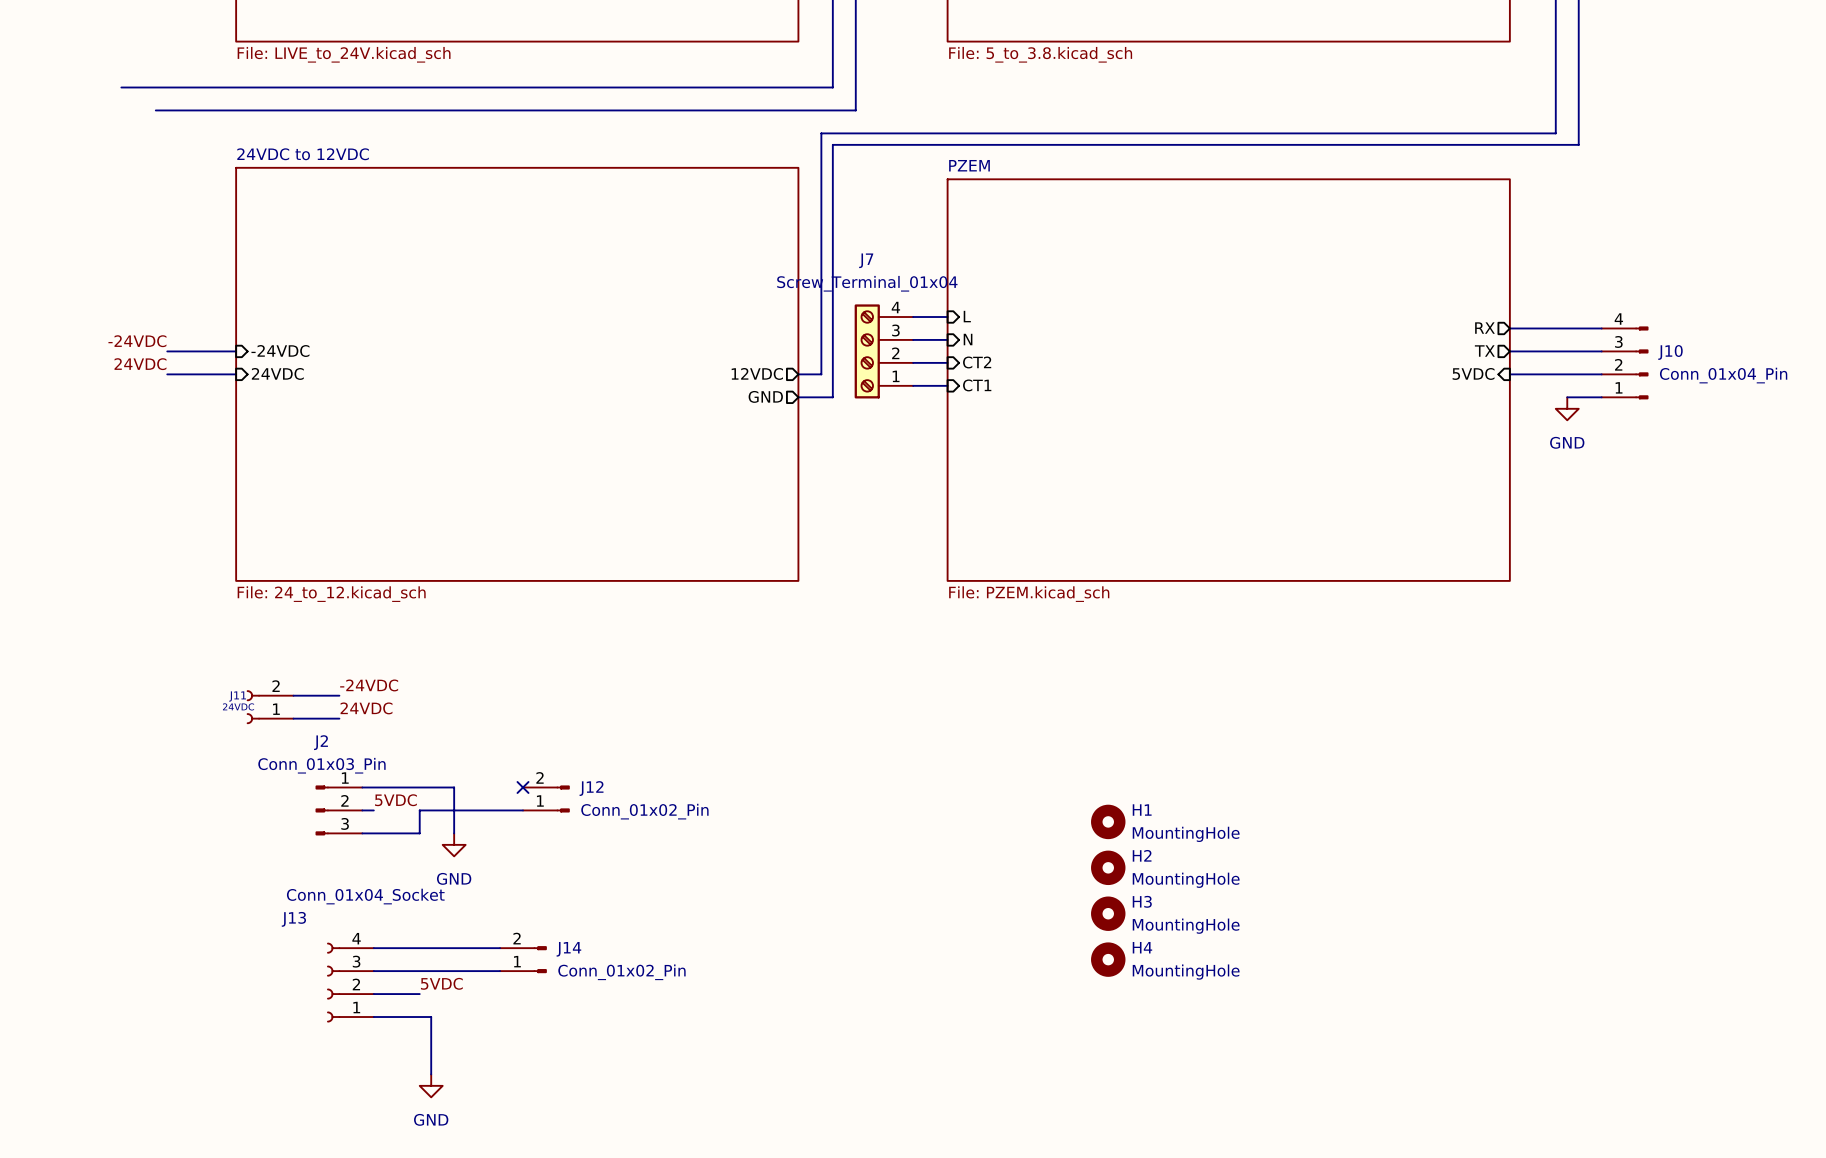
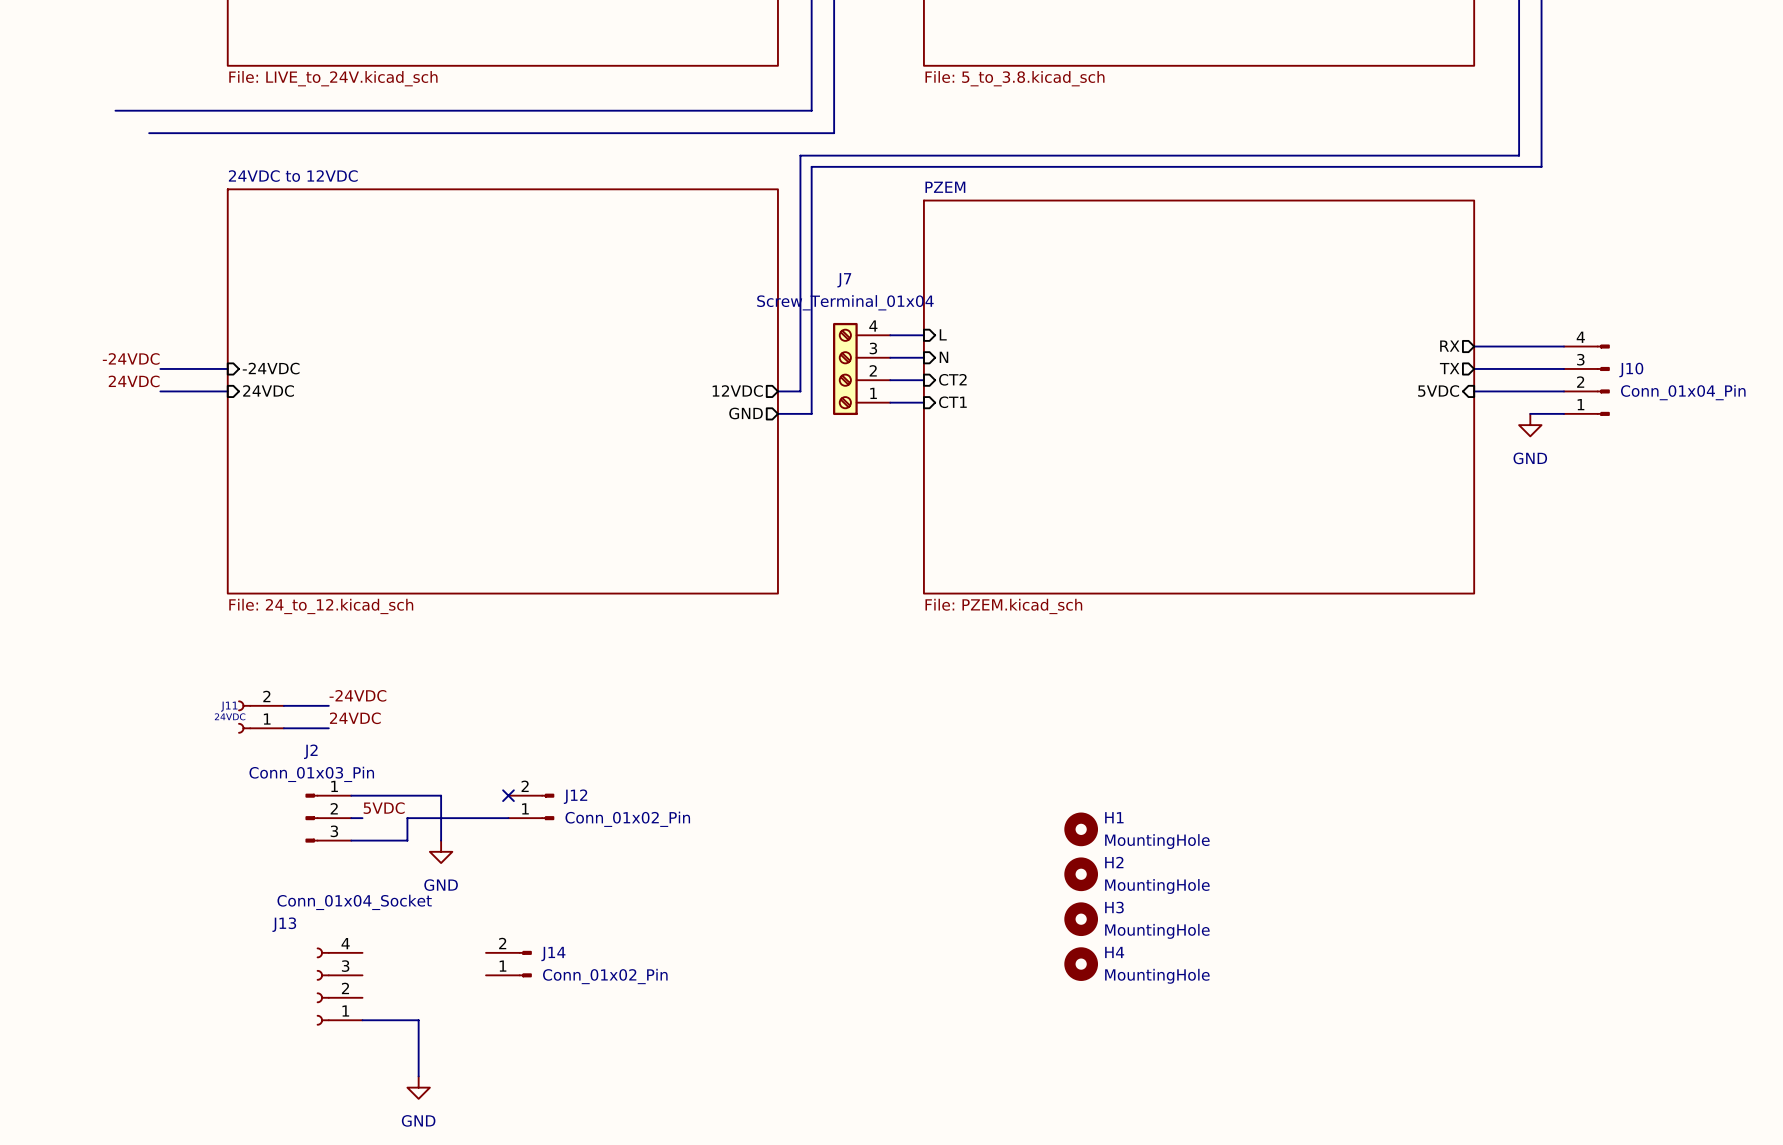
wire: (373, 948) (500, 948) -> none
wire: (373, 971) (500, 971) -> none
label: 5VDC (441, 983) -> none
wire: (373, 994) (419, 994) -> none

